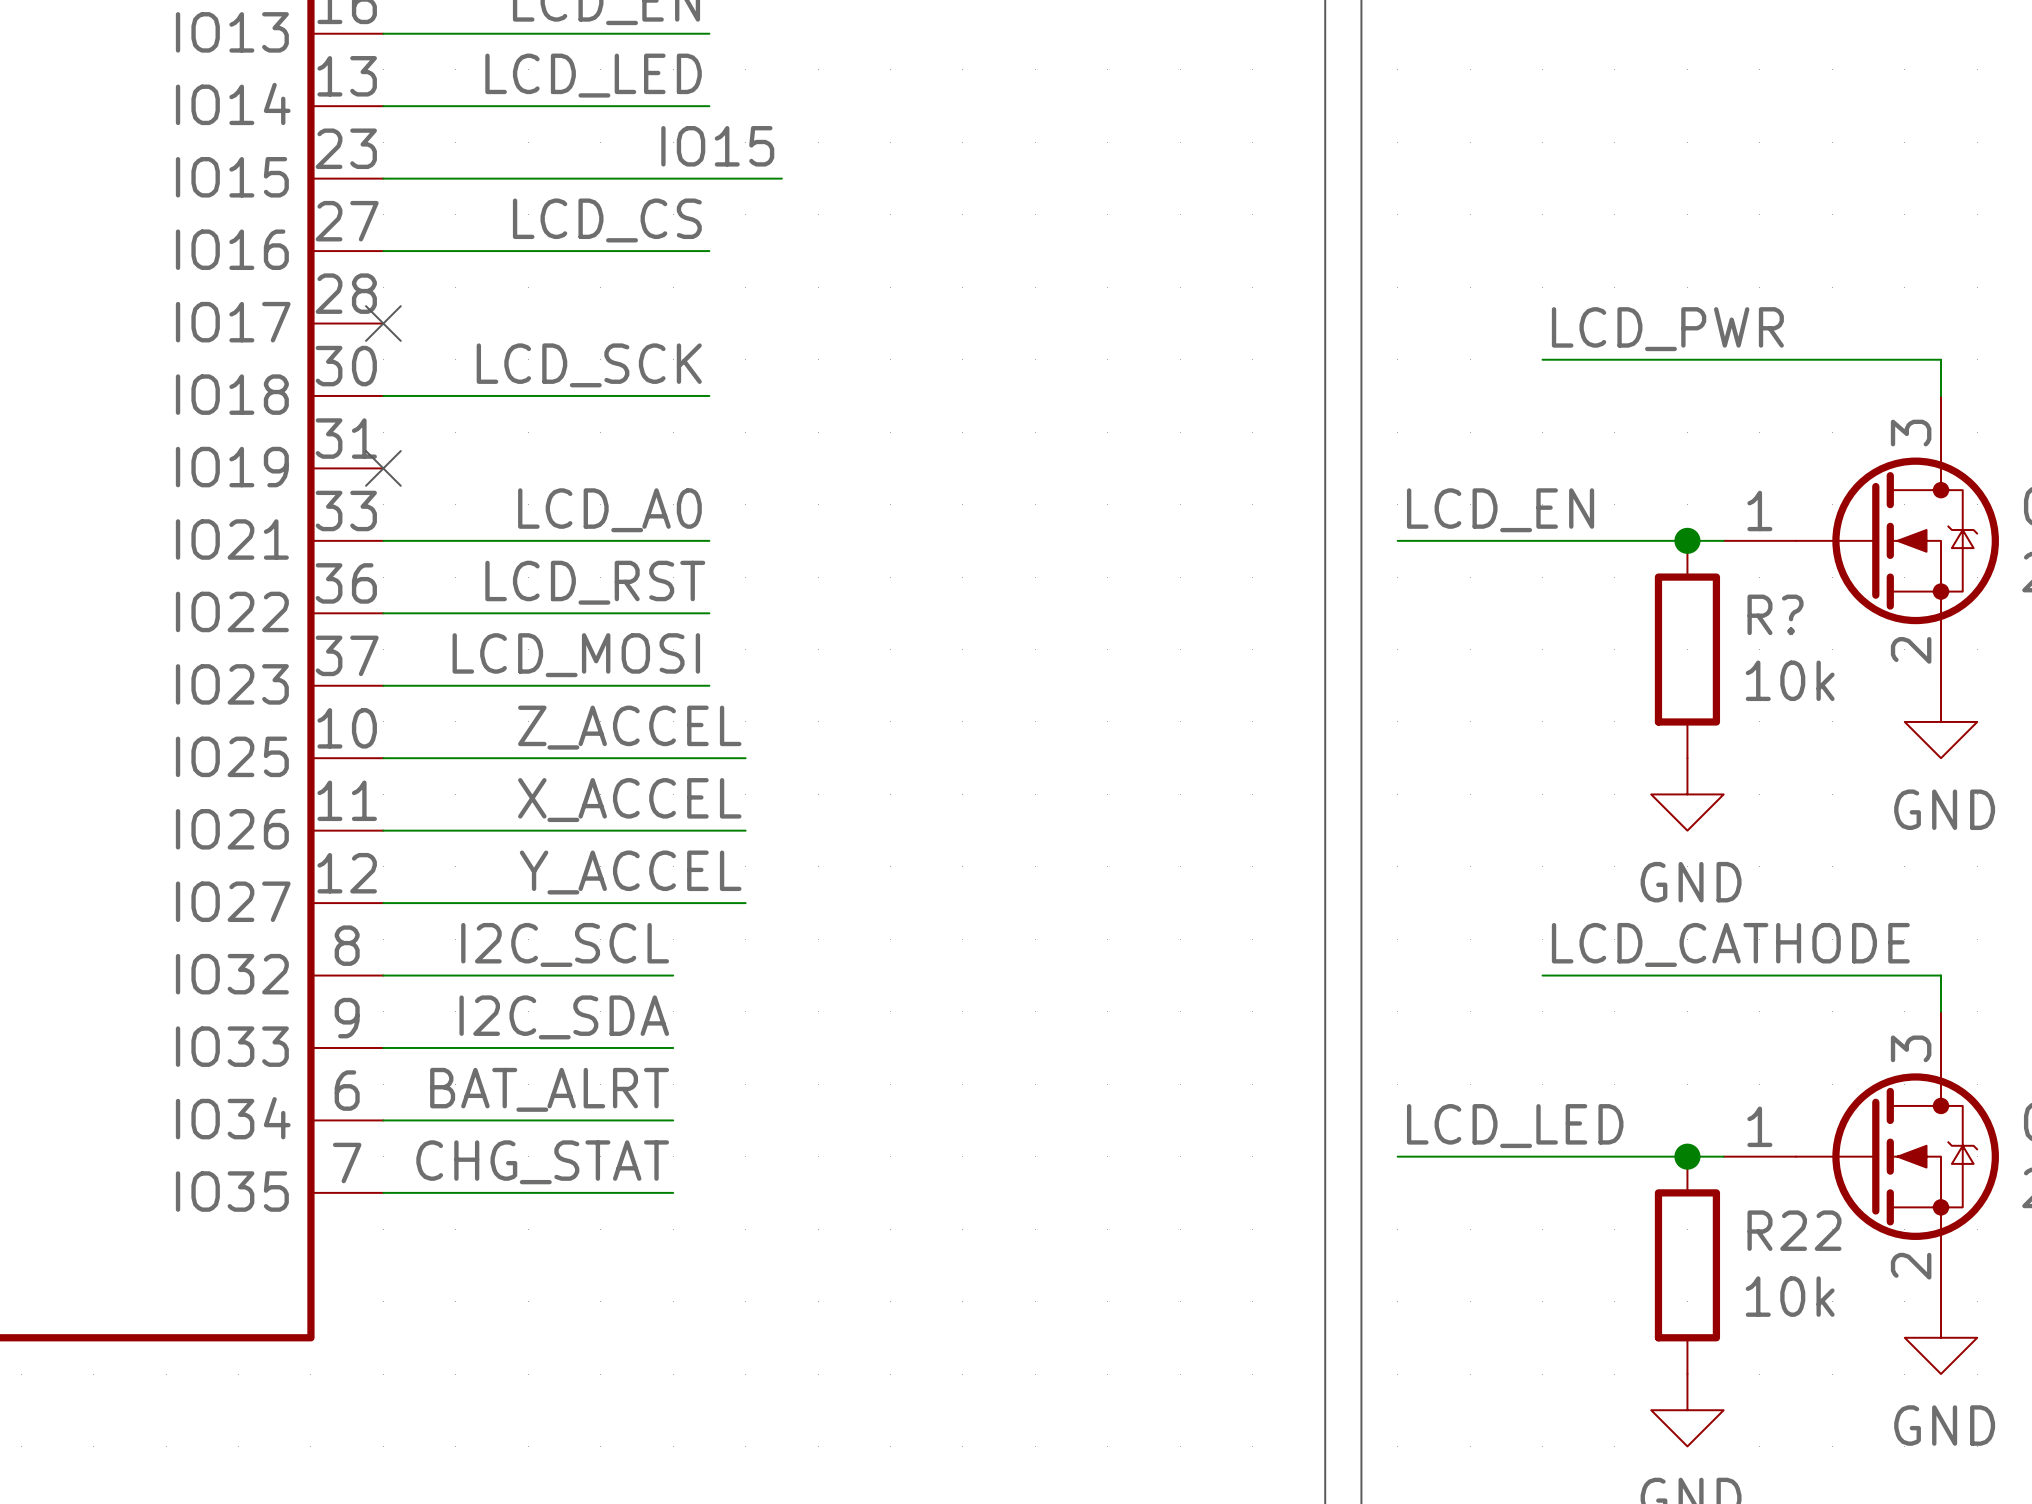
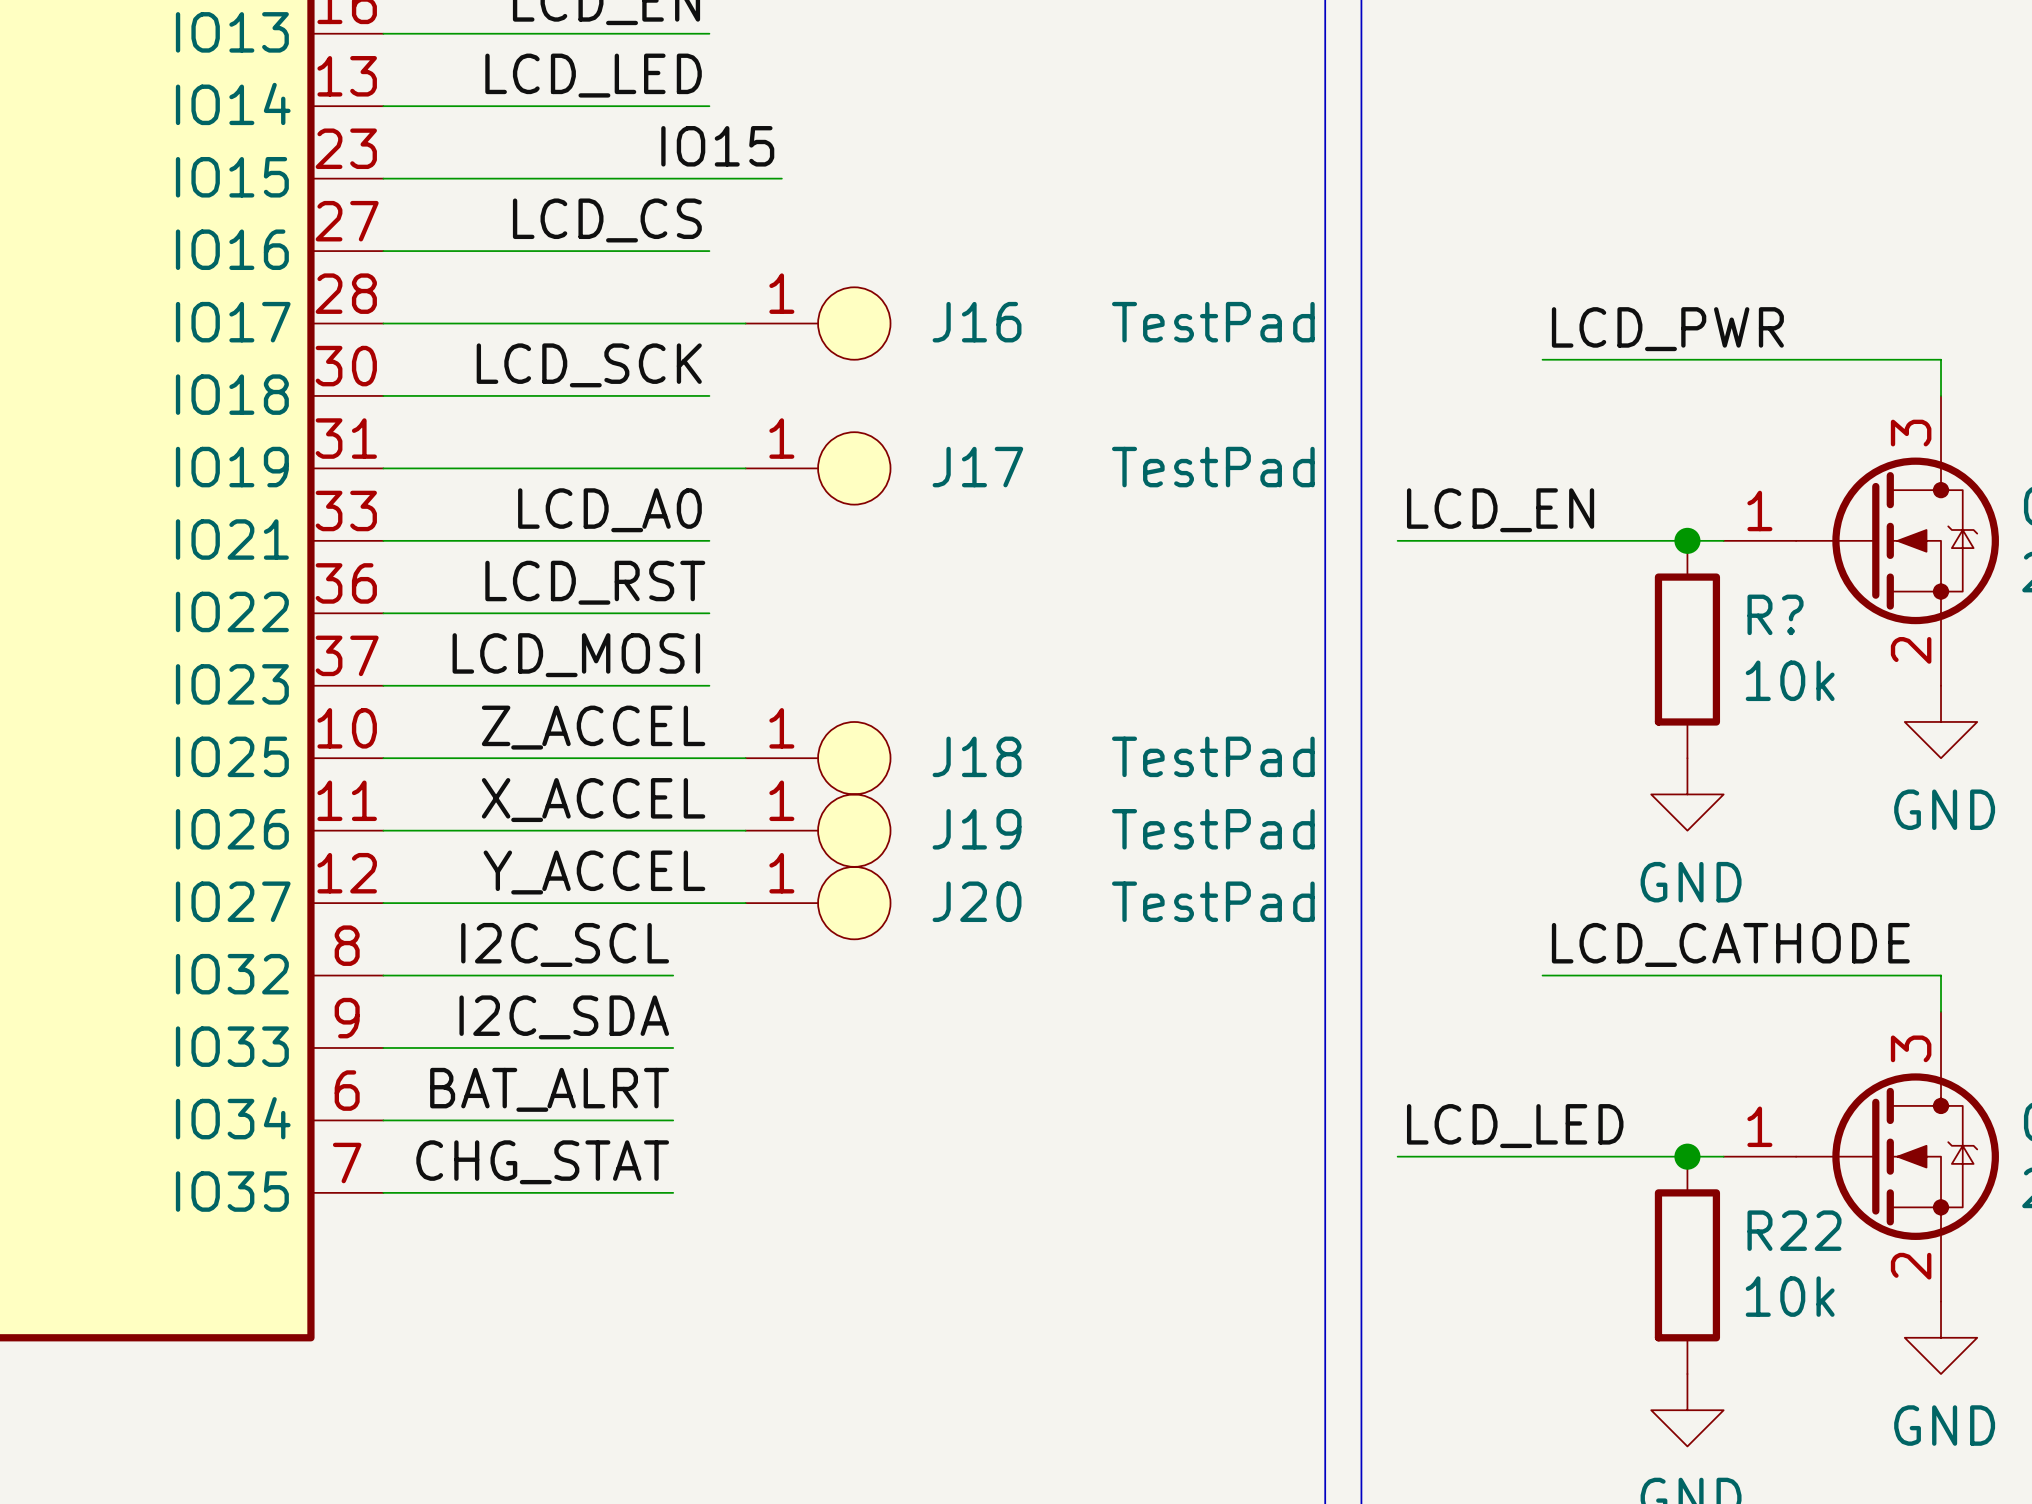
wire: none -> (383, 323) (745, 323)
no-connect mark: (383, 323) -> none
J16: none -> TestPad (818, 323)
wire: none -> (383, 468) (745, 468)
no-connect mark: (383, 468) -> none
J17: none -> TestPad (818, 468)
label position: Z_ACCEL (629, 727) -> Z_ACCEL (593, 727)
J18: none -> TestPad (818, 758)
label position: X_ACCEL (629, 800) -> X_ACCEL (593, 800)
J19: none -> TestPad (818, 830)
label position: Y_ACCEL (630, 872) -> Y_ACCEL (594, 872)
J20: none -> TestPad (818, 903)

